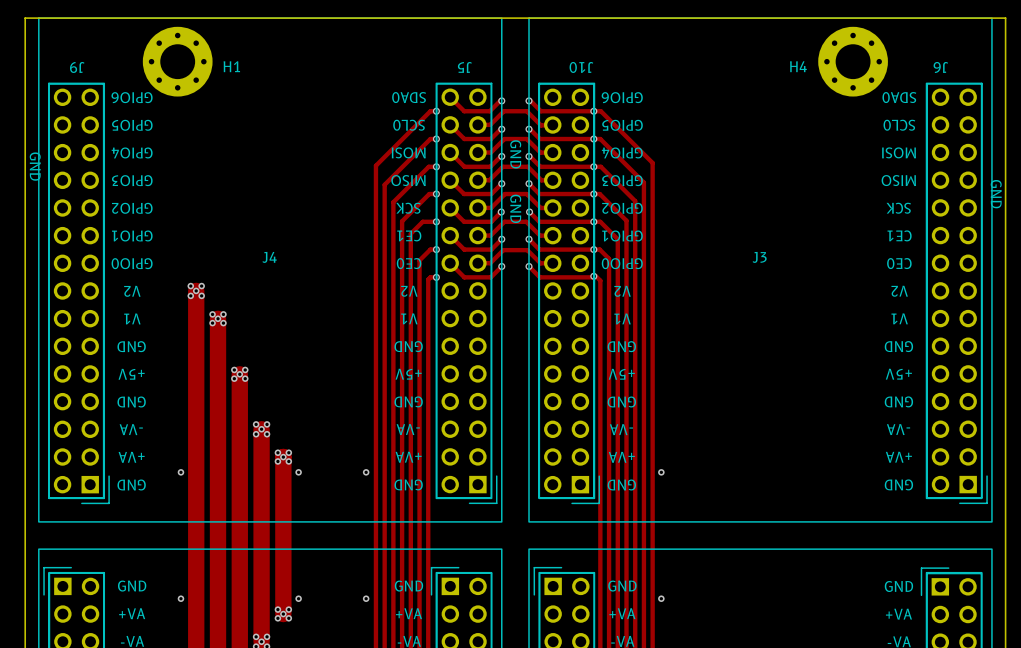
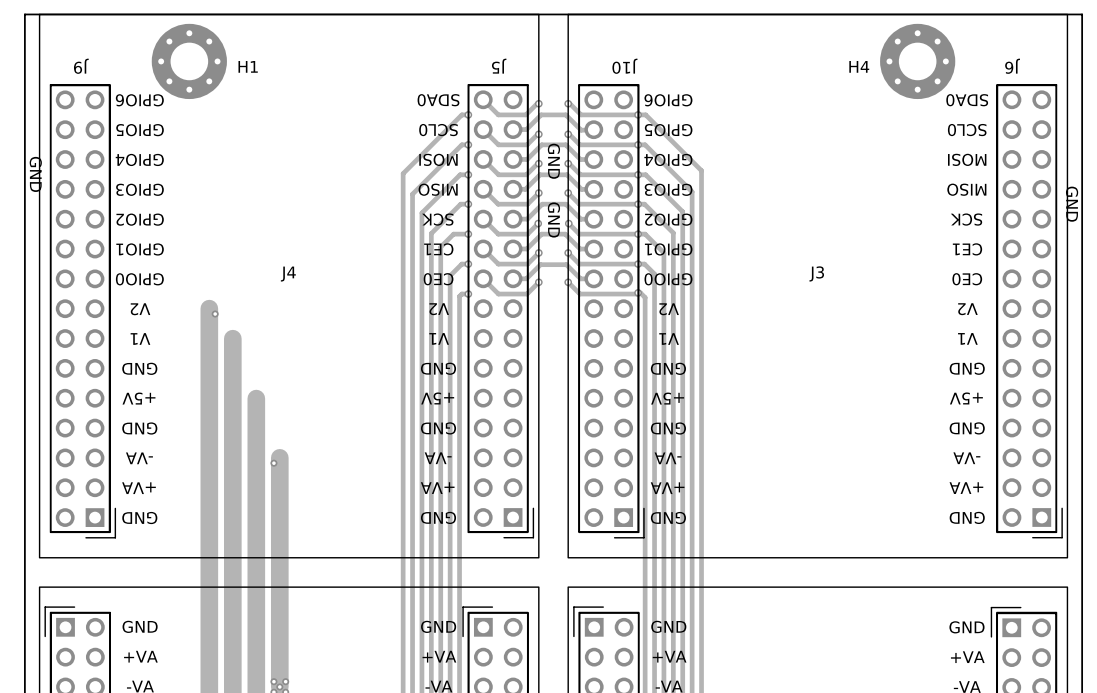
via: (190, 286) -> none
via: (201, 286) -> none
via: (196, 290) -> none
via: (190, 295) -> none
via: (212, 314) -> none
via: (223, 314) -> none
via: (218, 318) -> none
via: (212, 323) -> none
via: (223, 323) -> none
via: (234, 369) -> none
via: (245, 369) -> none
via: (239, 374) -> none
via: (234, 378) -> none
via: (245, 378) -> none
via: (256, 424) -> none
via: (267, 424) -> none
via: (261, 429) -> none
via: (267, 434) -> none
via: (277, 452) -> none
via: (288, 452) -> none
track: (283, 456) (283, 614) -> none
via: (283, 457) -> none
via: (277, 461) -> none
via: (288, 461) -> none
via: (180, 472) -> none
via: (298, 472) -> none
via: (366, 472) -> none
via: (661, 472) -> none
via: (180, 598) -> none
via: (298, 598) -> none
via: (366, 598) -> none
via: (661, 598) -> none
via: (277, 609) -> none
via: (288, 609) -> none
via: (283, 614) -> none
via: (277, 618) -> none
via: (288, 618) -> none

